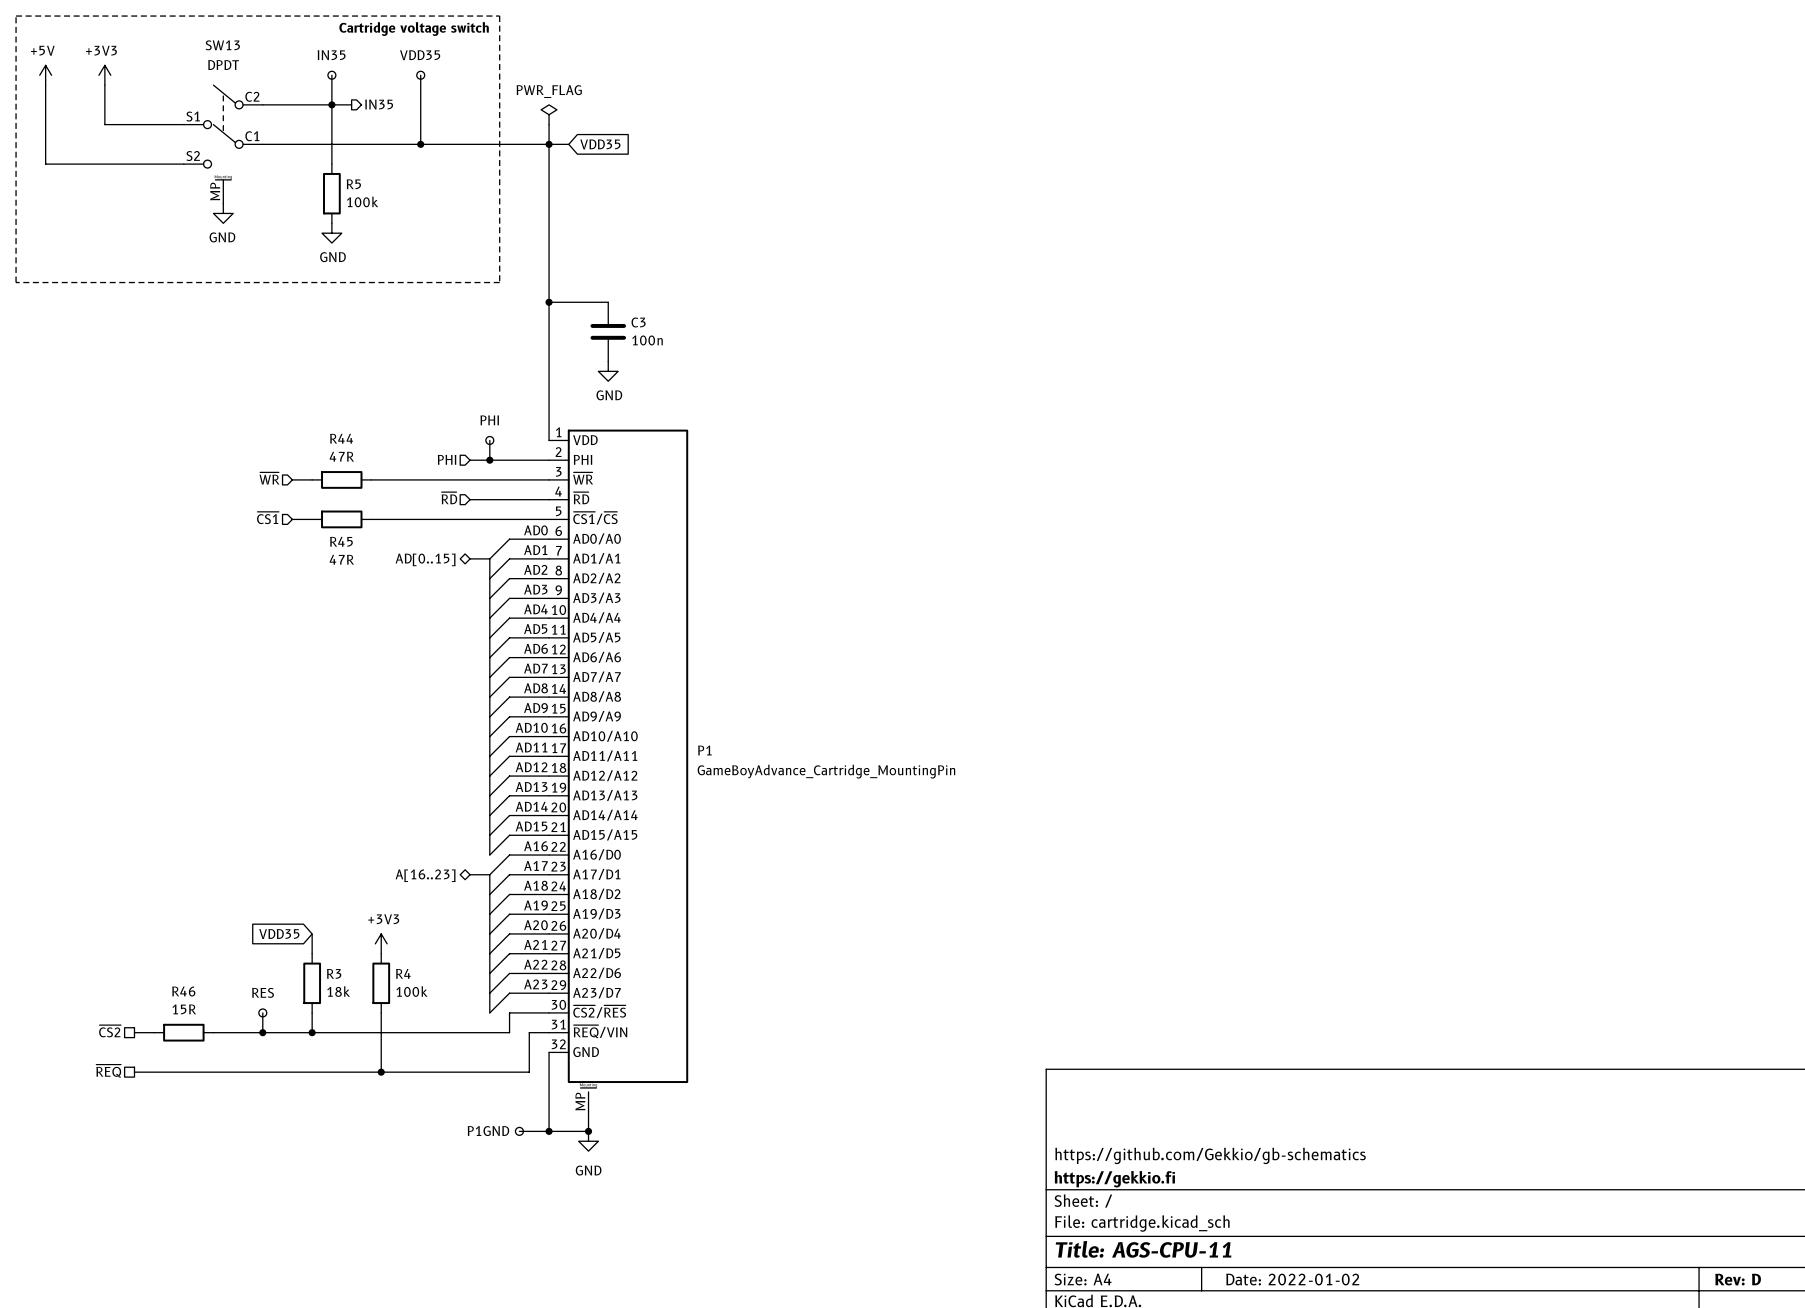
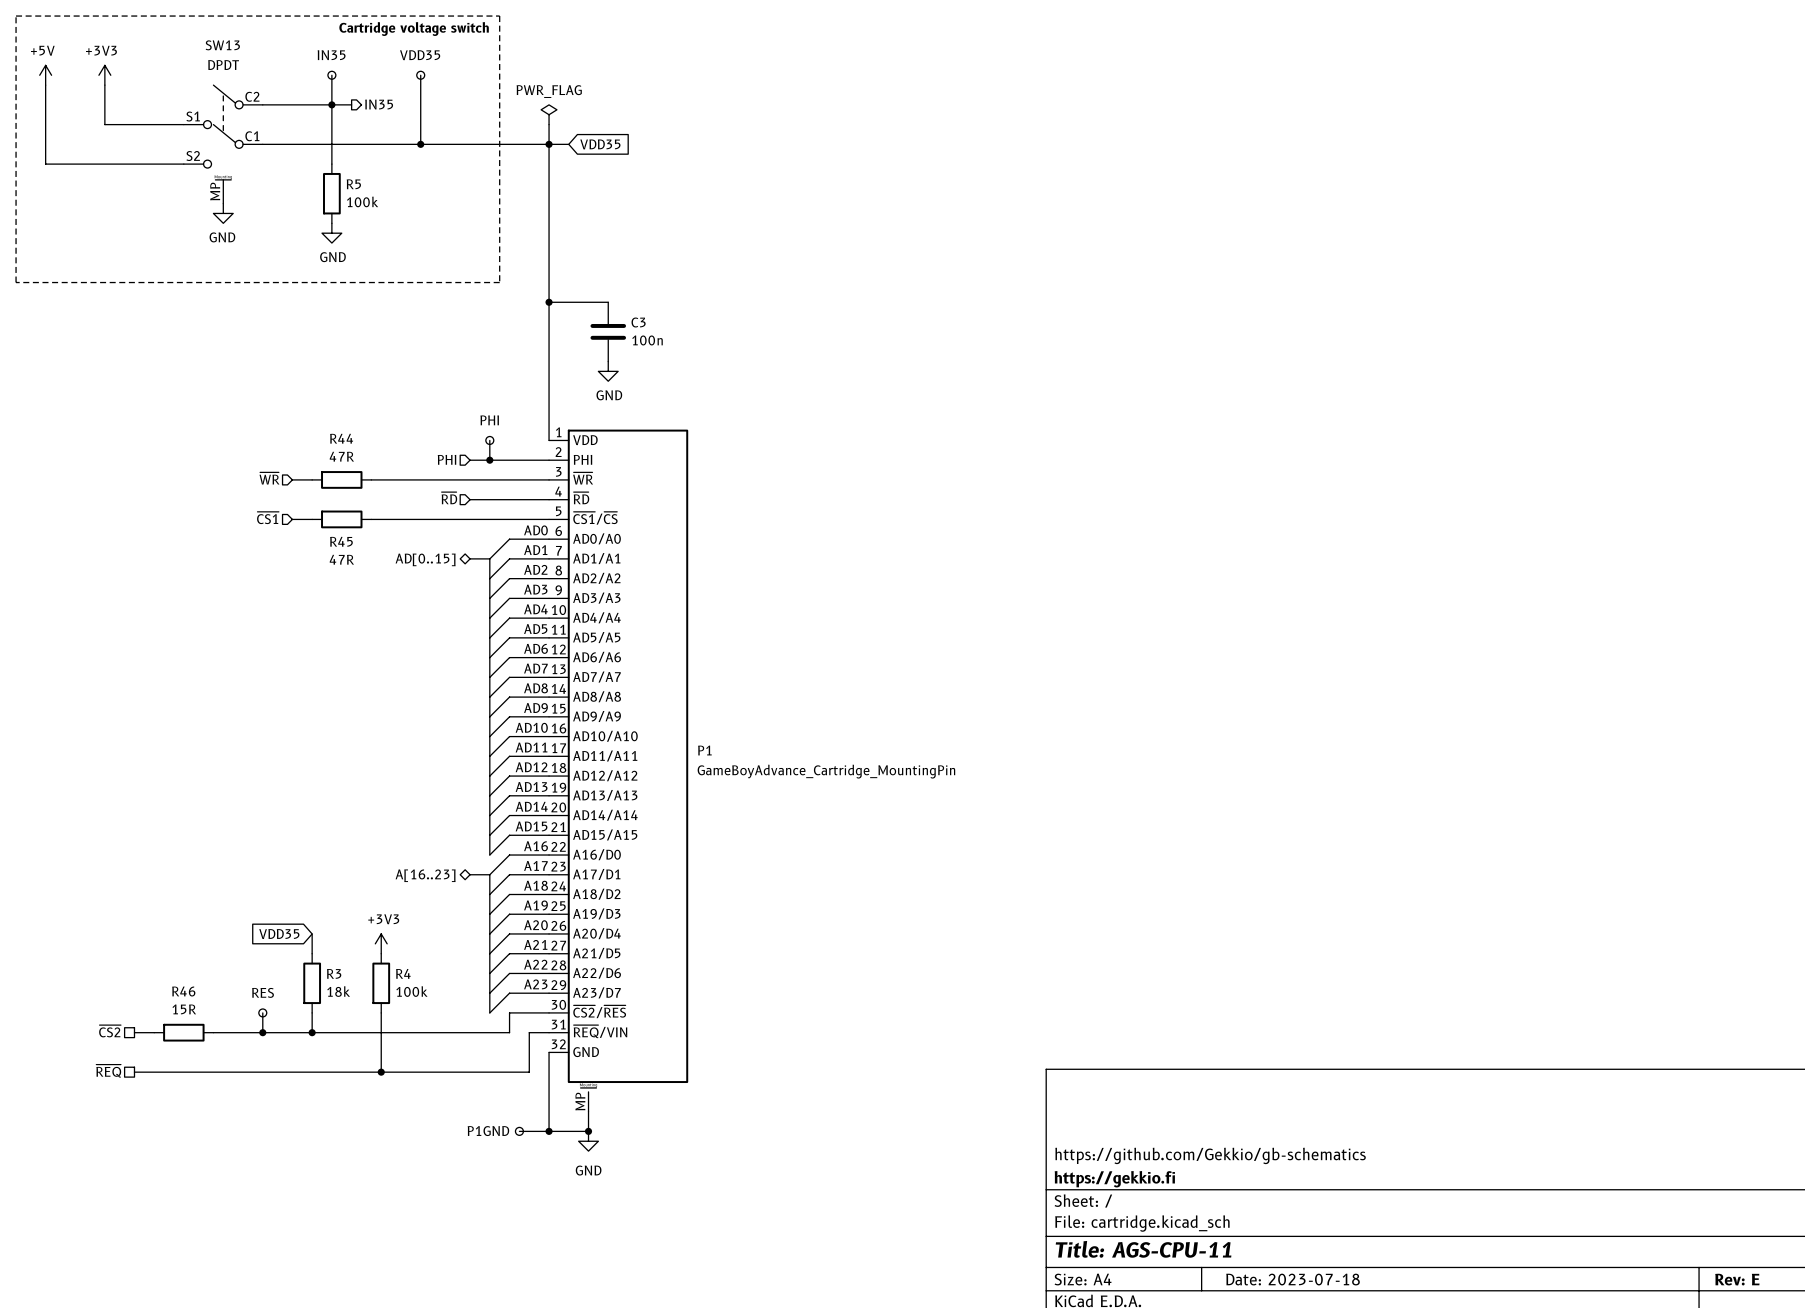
title block: Date: 2022-01-02 (1292, 1279) -> Date: 2023-07-18 (1293, 1279)
title block: Rev: D (1738, 1279) -> Rev: E (1737, 1279)

